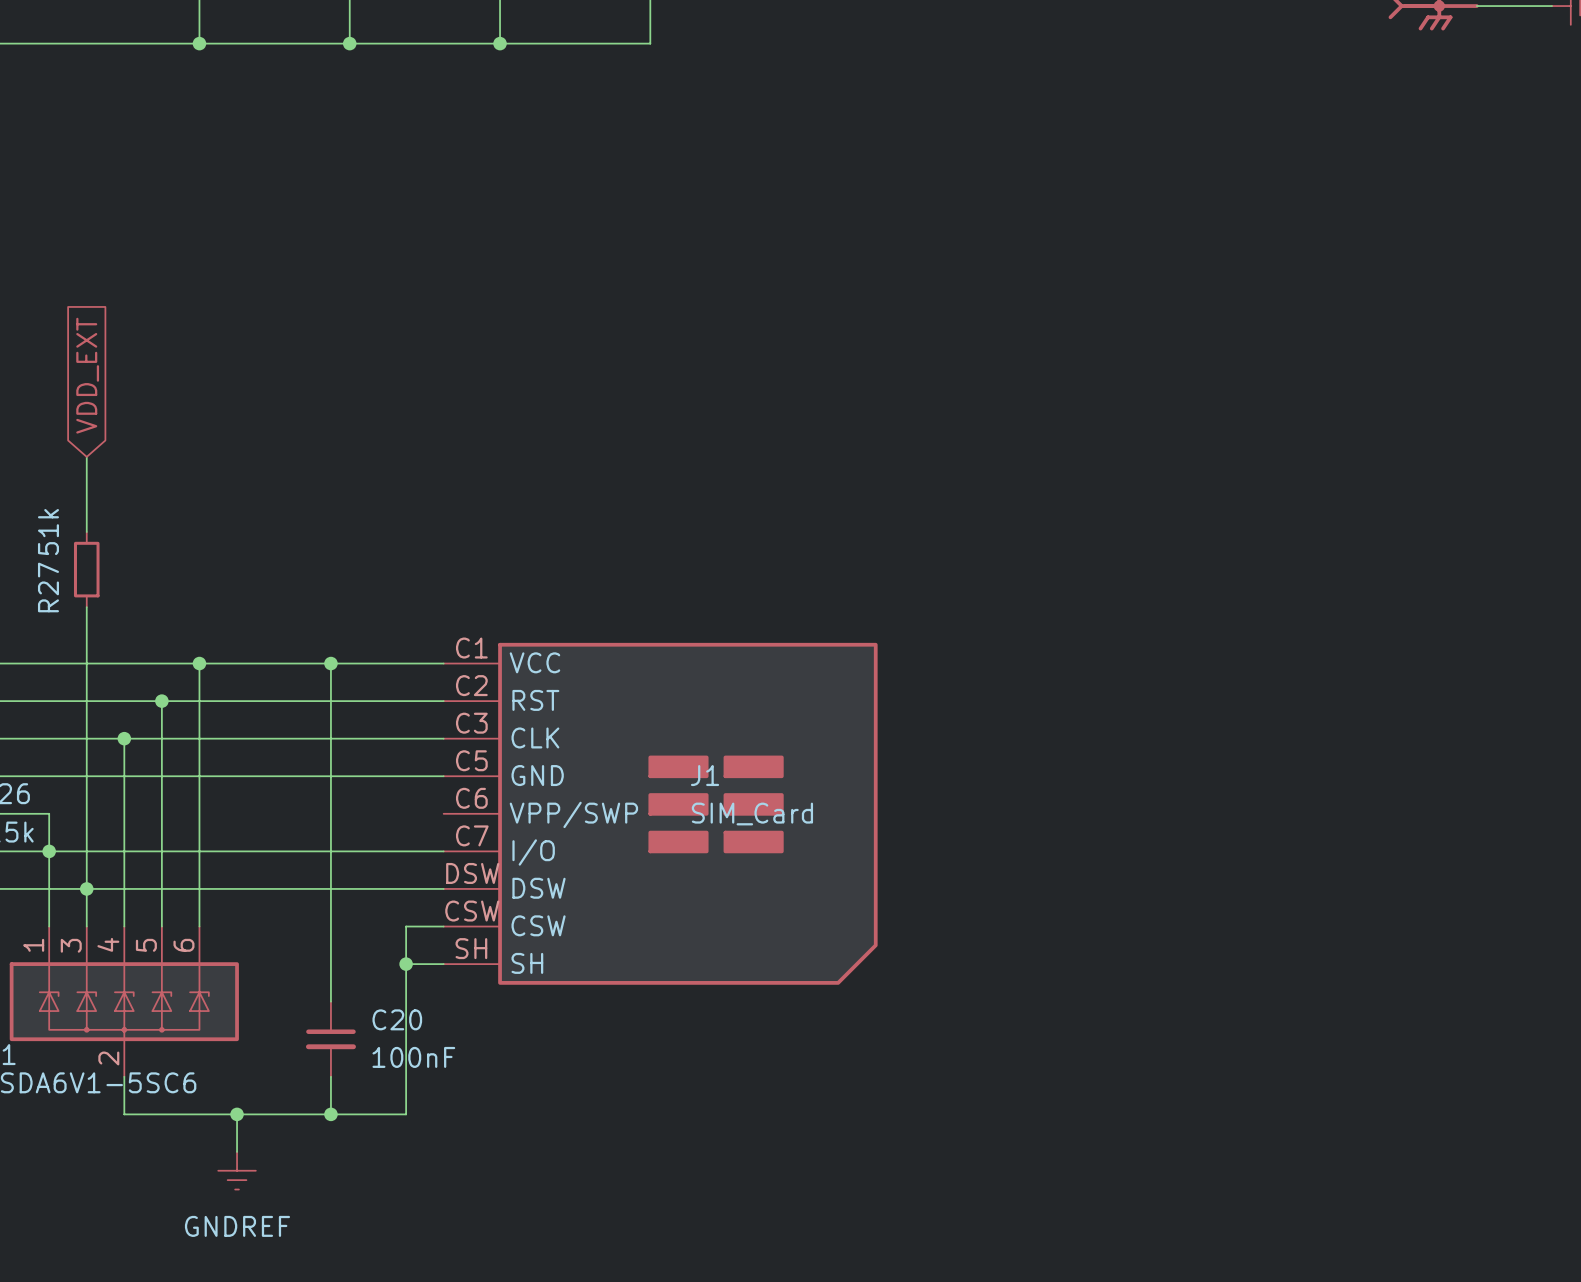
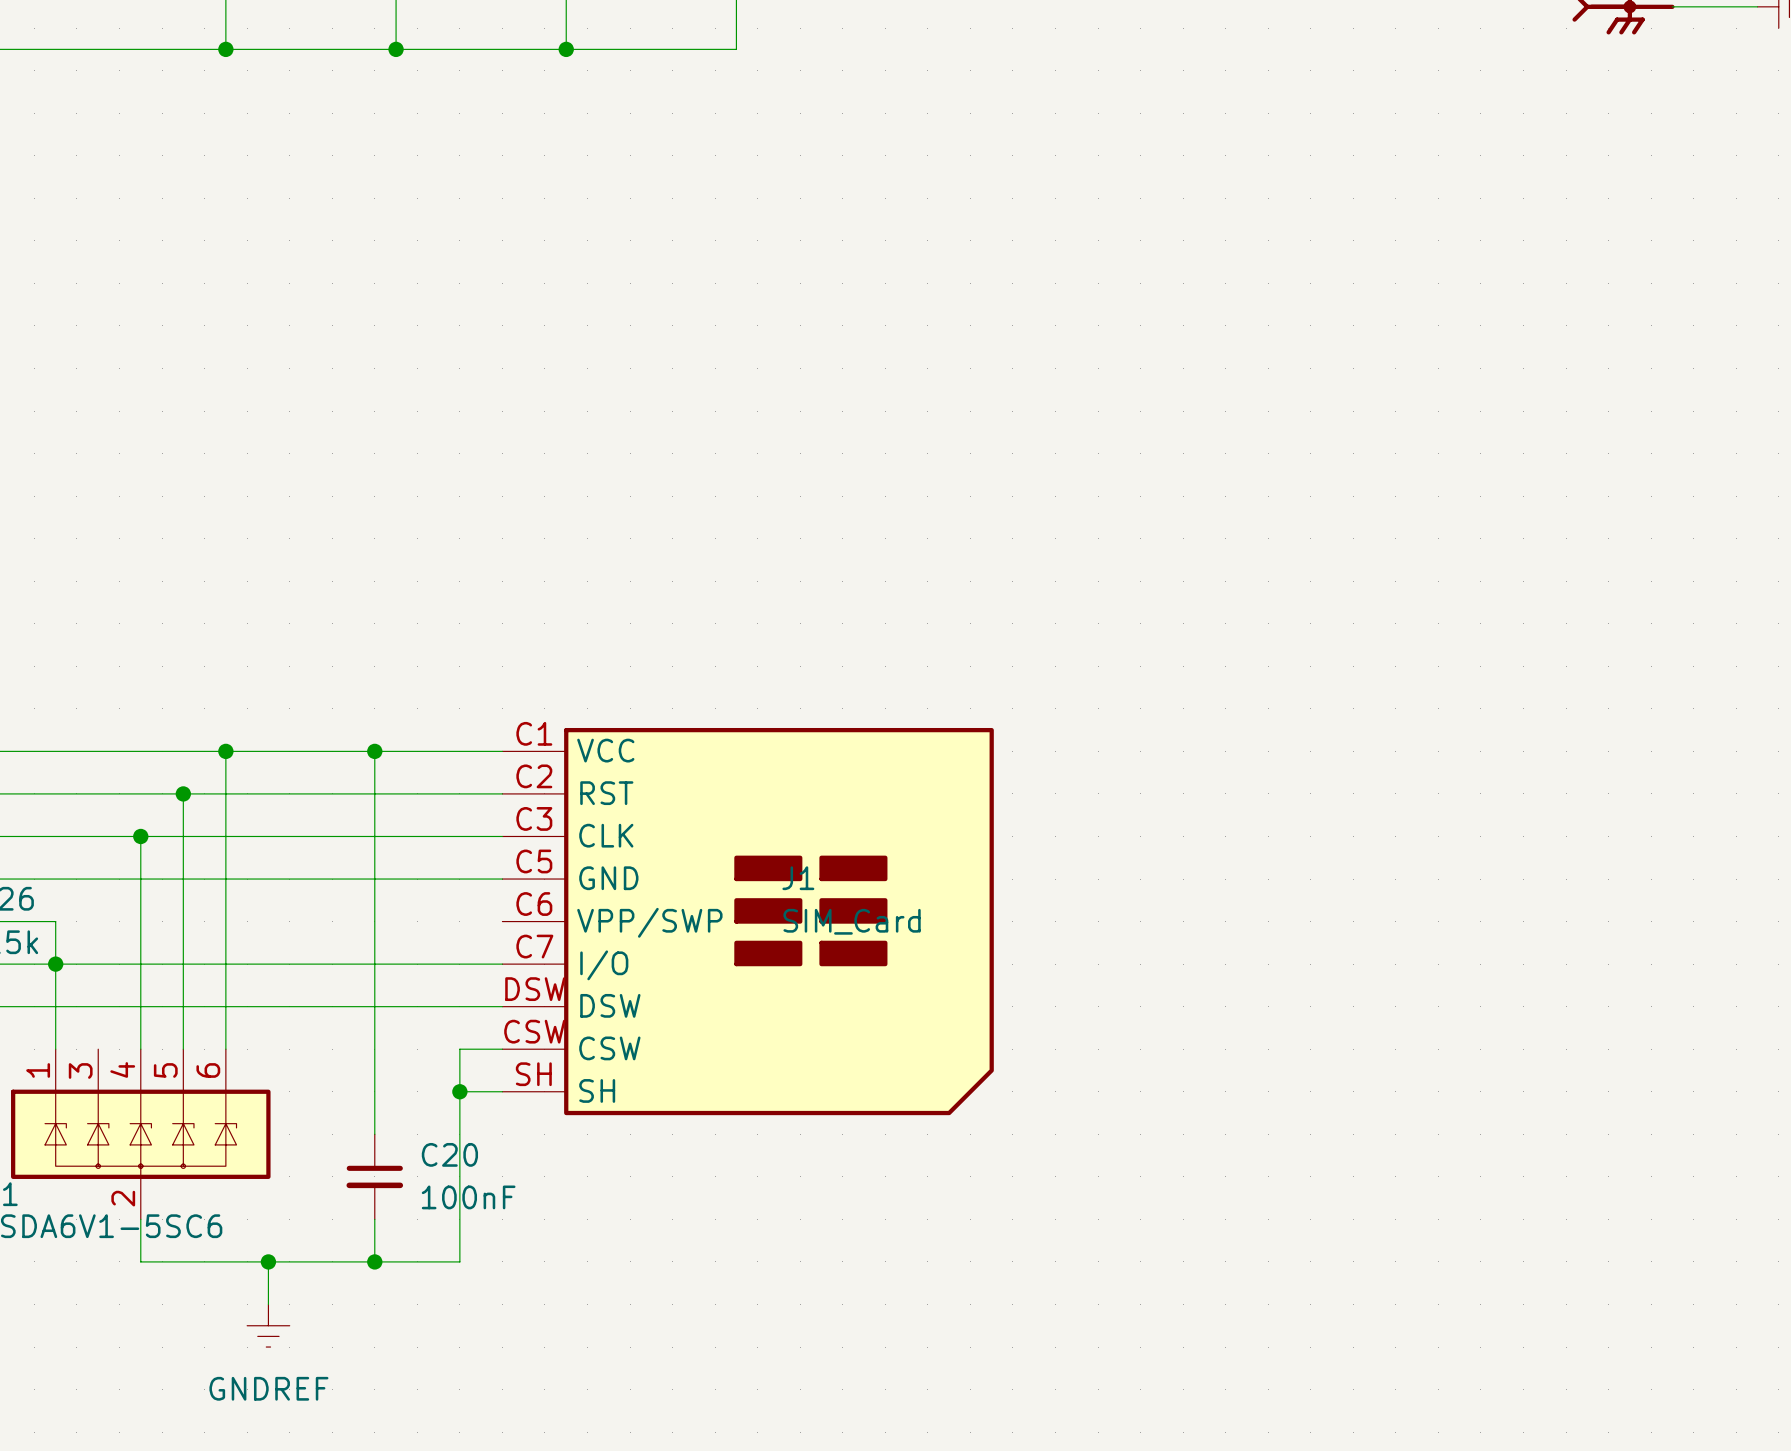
global label: VDD_EXT (87, 375) -> none
wire: (86, 456) (86, 532) -> none
R27: 51k (86, 569) -> none
wire: (86, 607) (86, 926) -> none
junction: (86, 888) -> none

